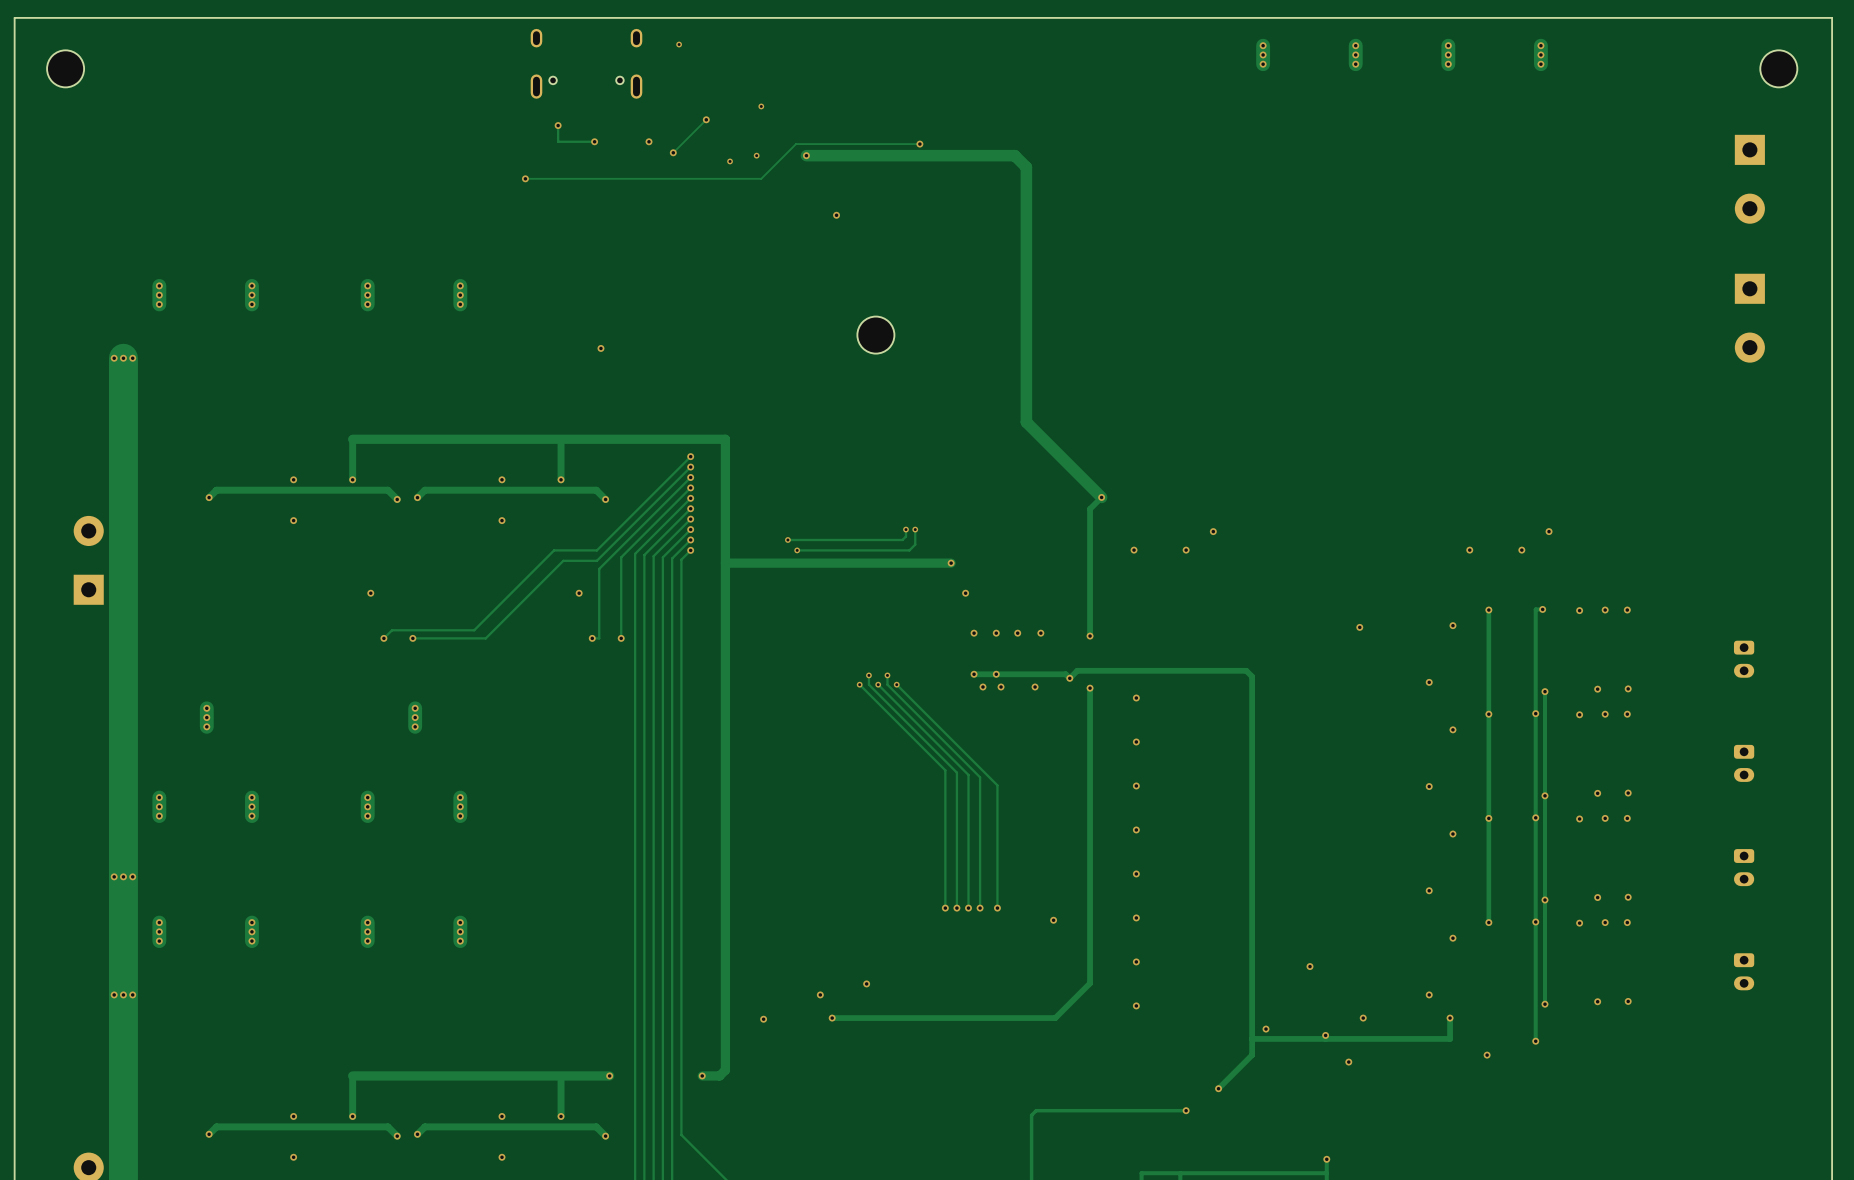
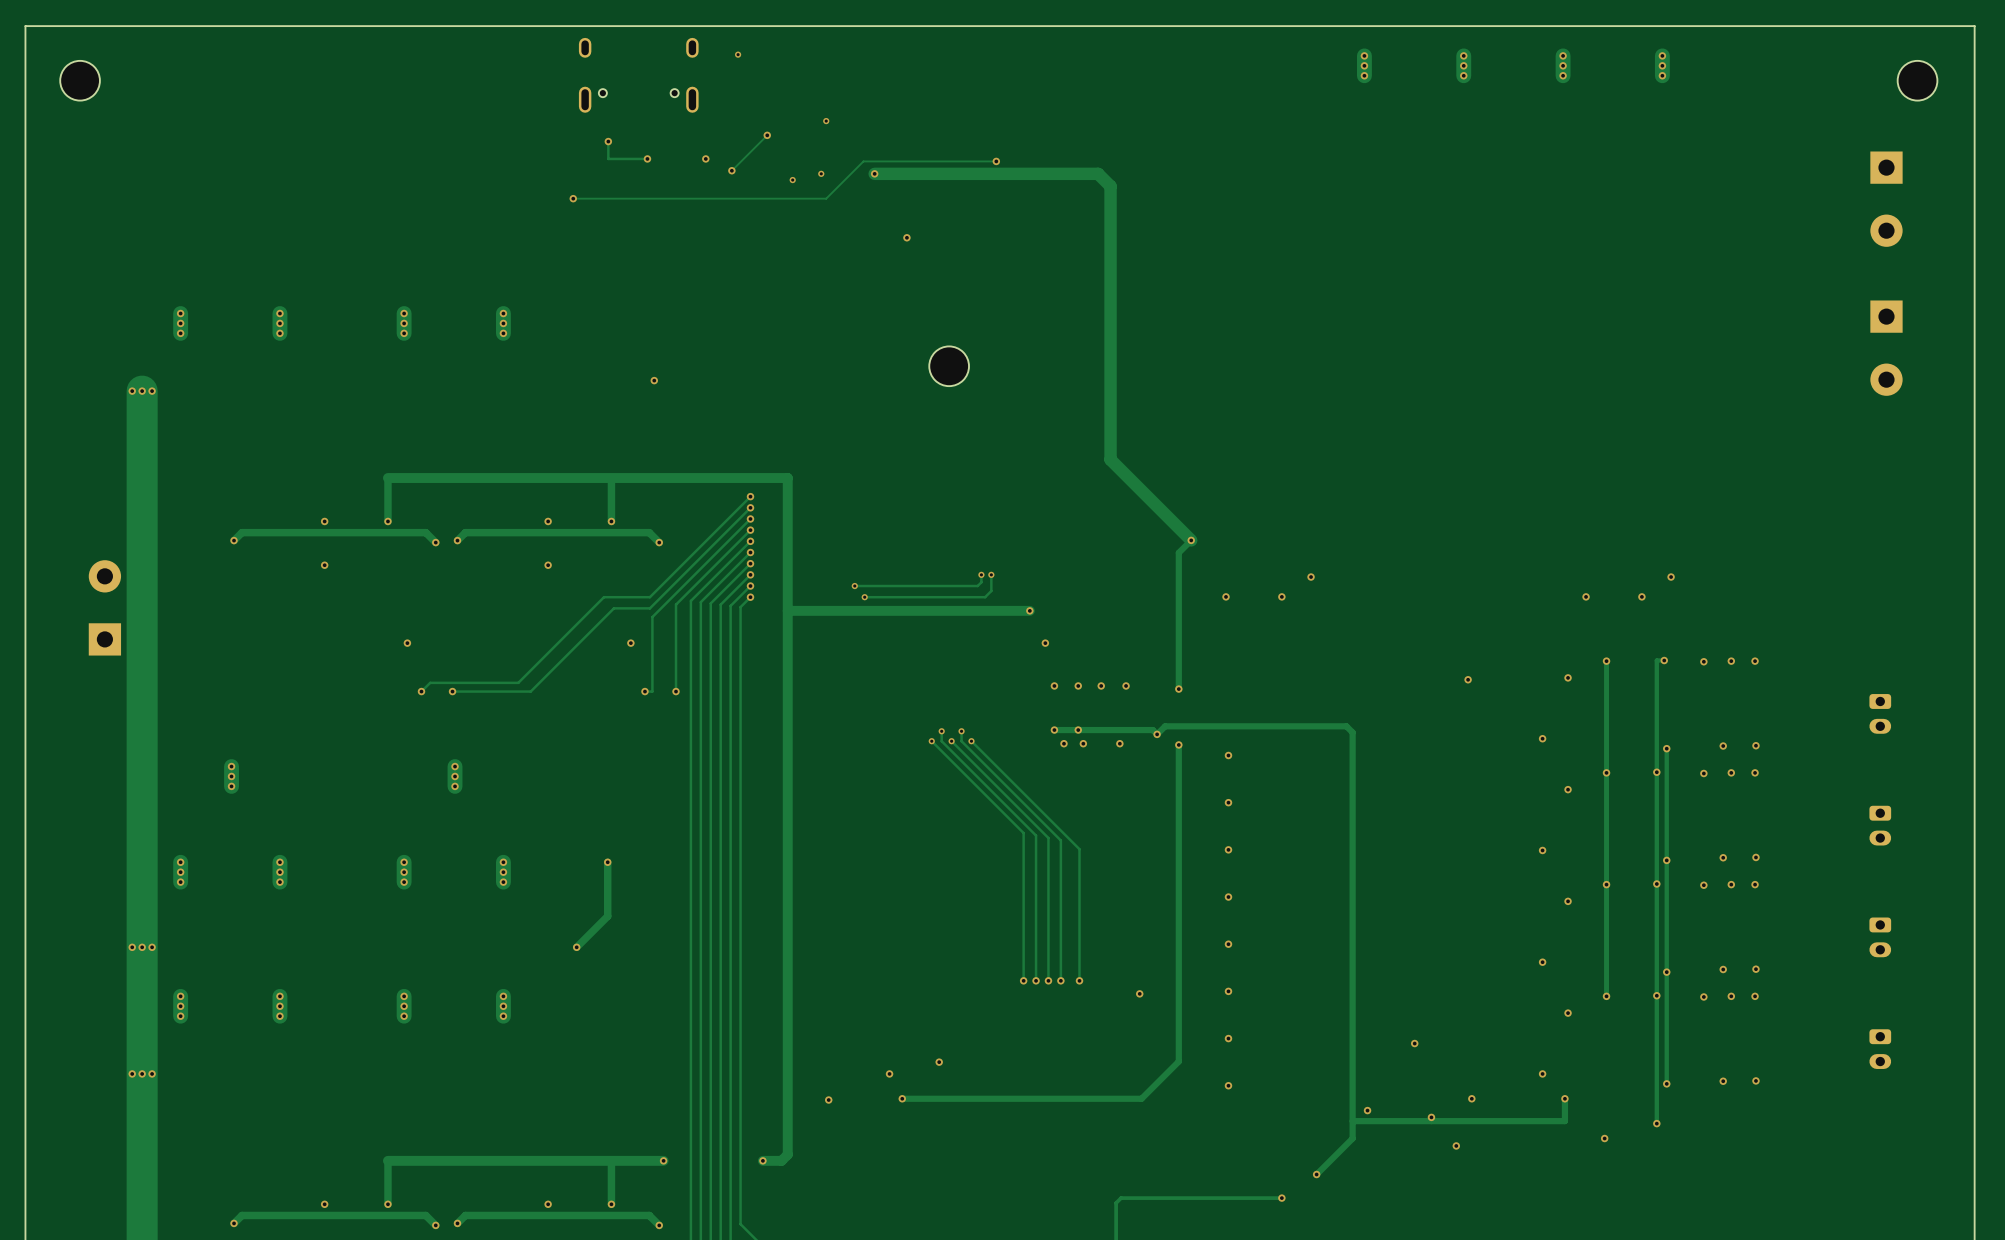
track: none -> (607, 862) (607, 916) (576, 947)
via: none -> (607, 862)
via: none -> (576, 947)

